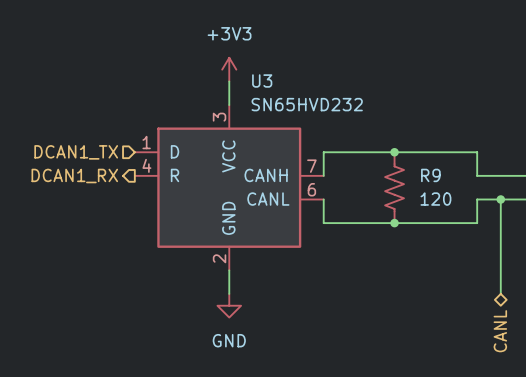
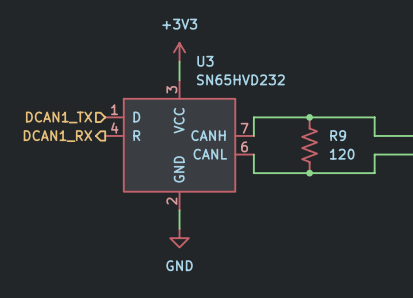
wire: (500, 199) (500, 293) -> none
junction: (500, 199) -> none
hierarchical label: CANL (500, 331) -> none

